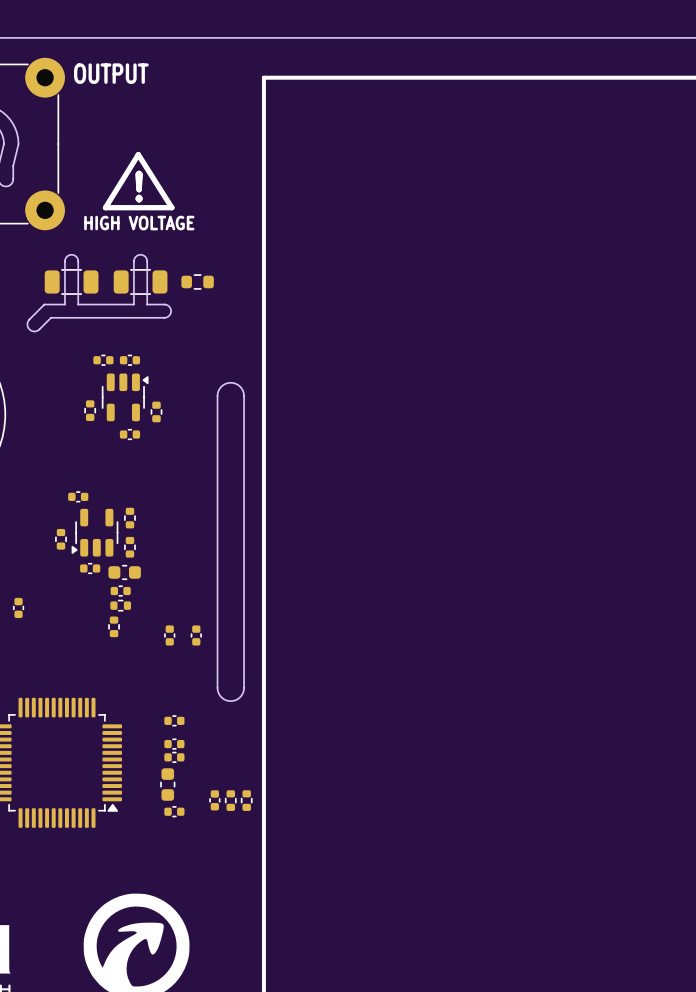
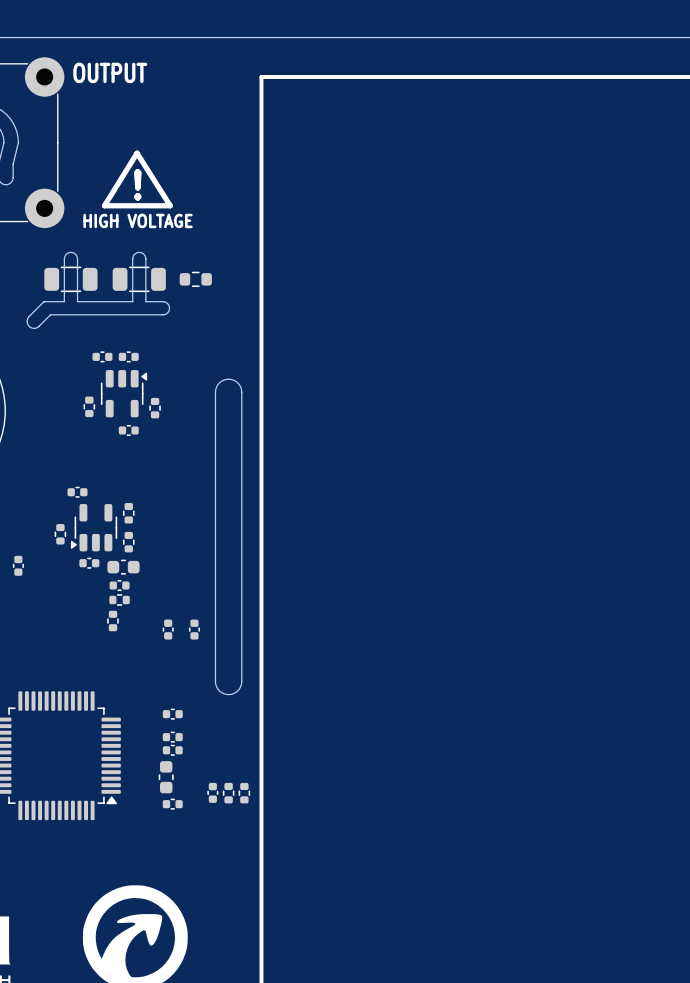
part position: (18, 607) -> (18, 565)

